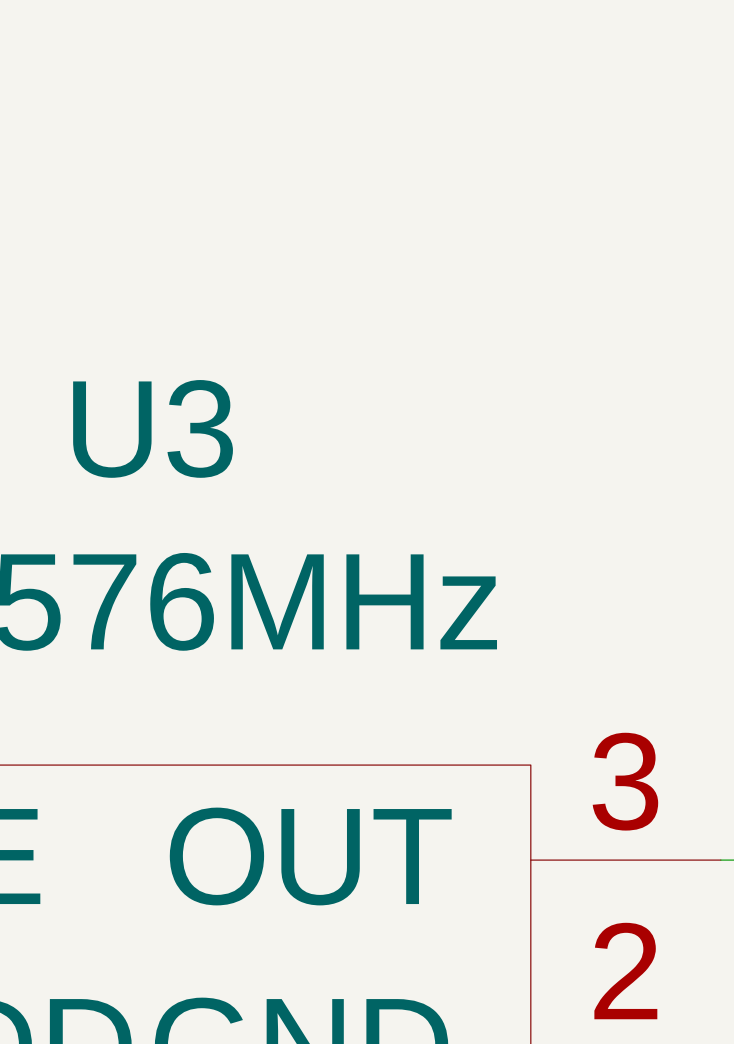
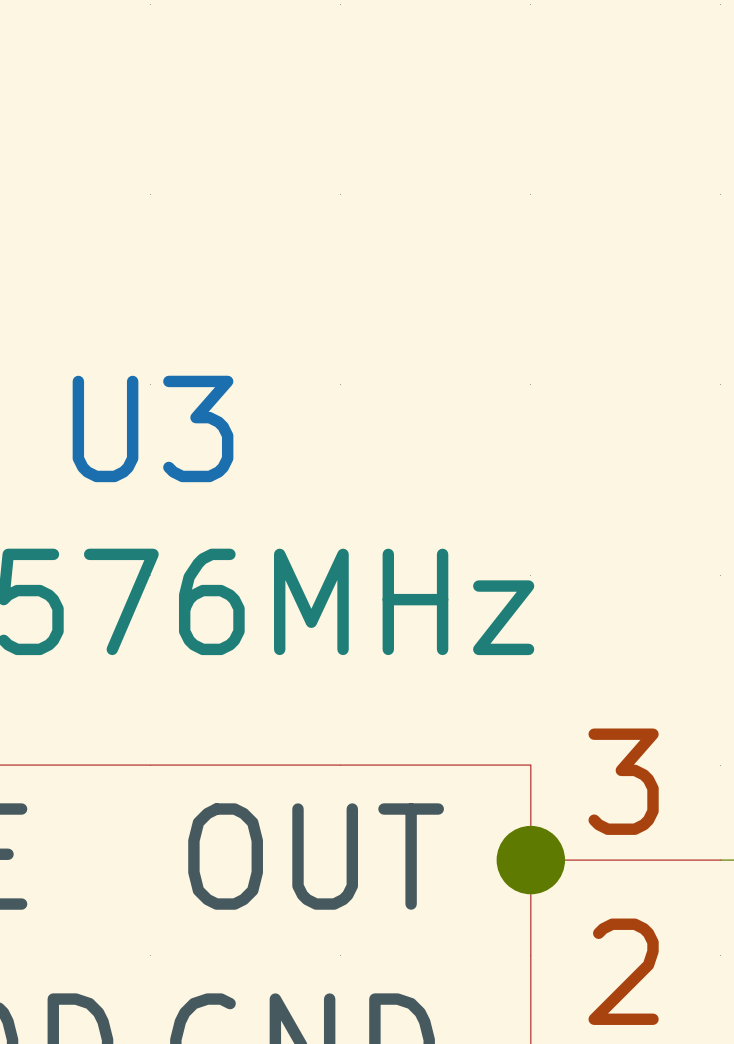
junction: none -> (530, 860)

